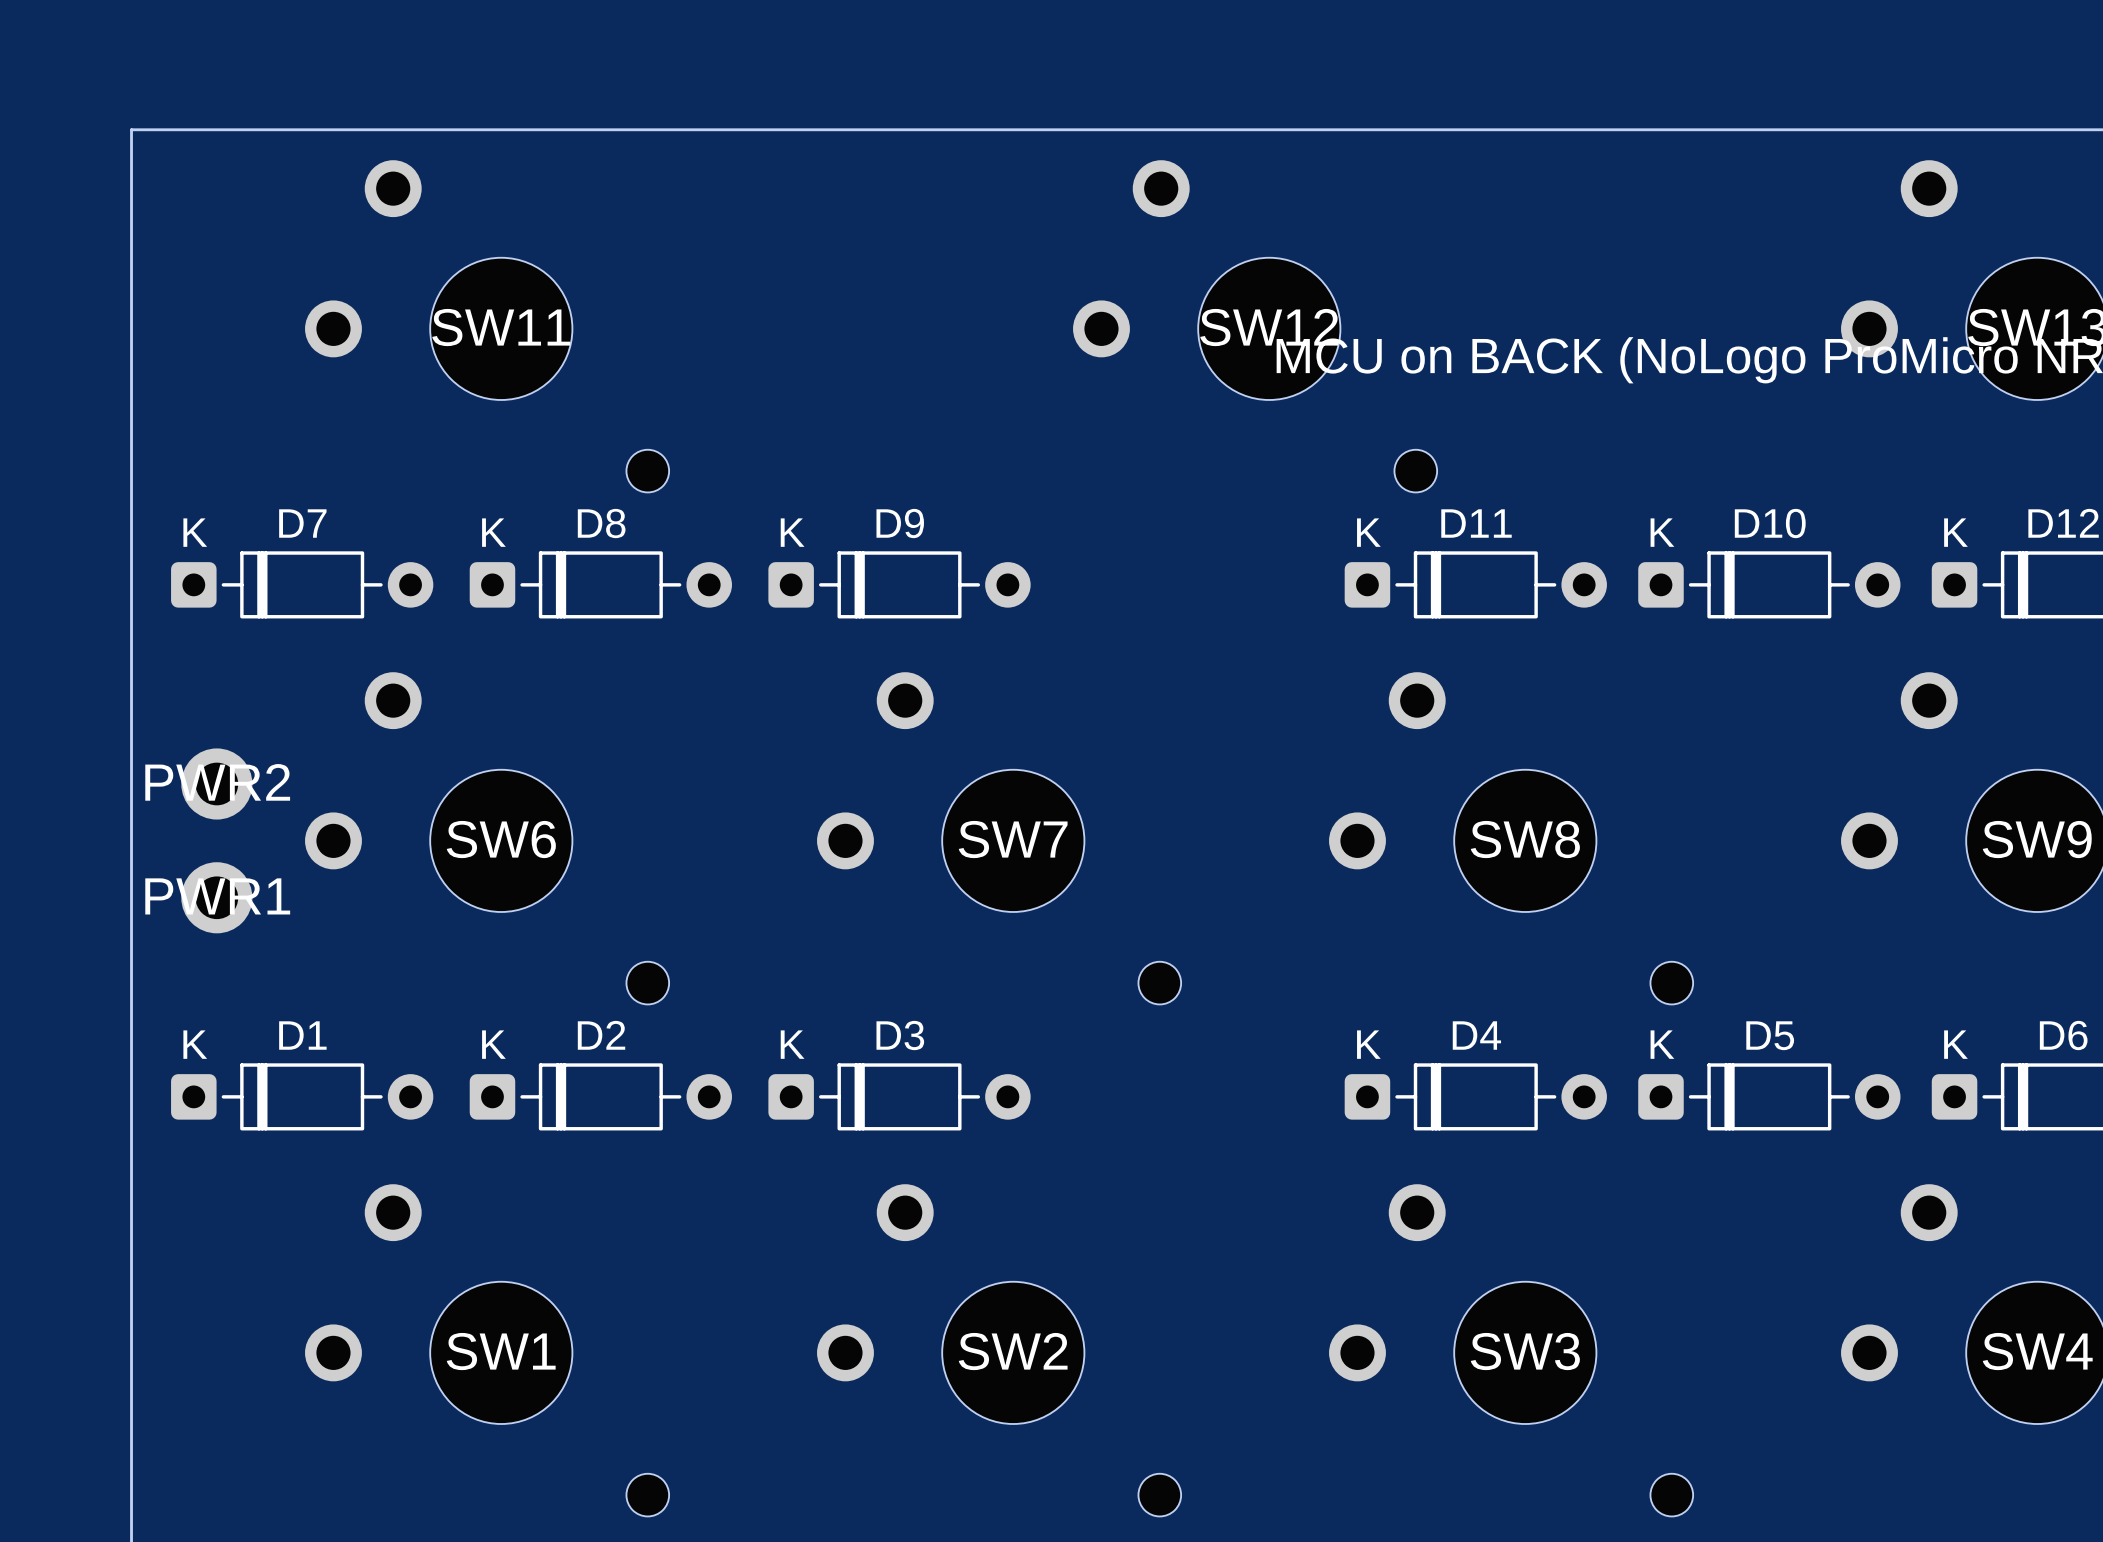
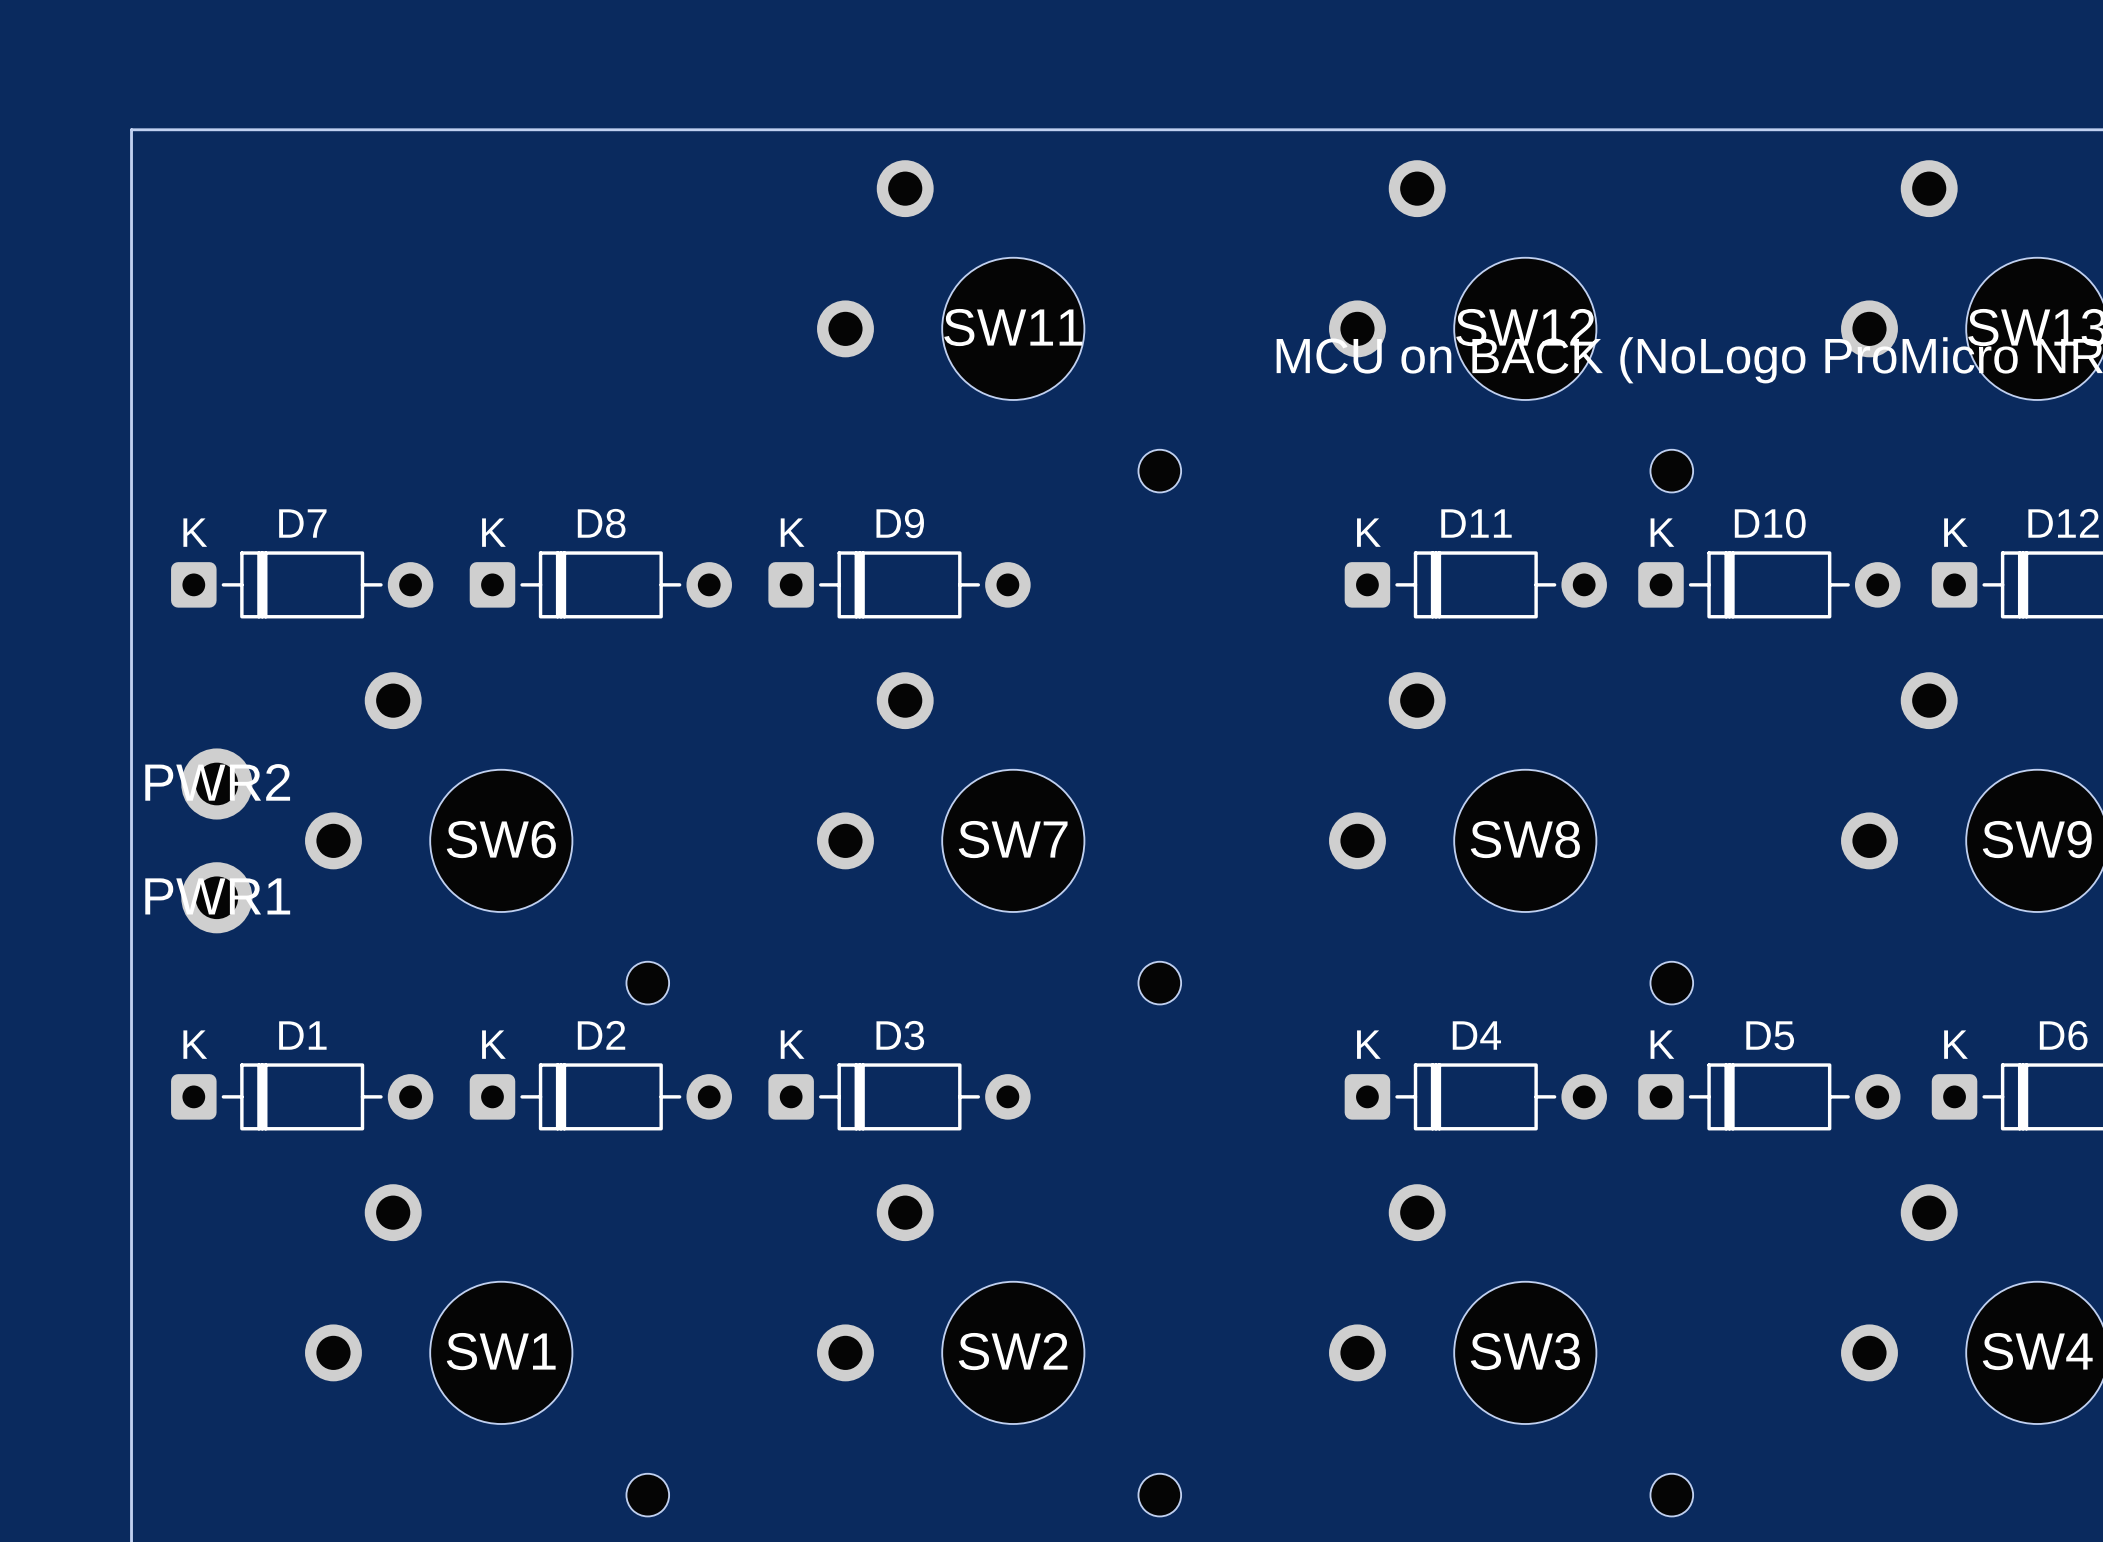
SW11 position: (487, 326) -> (999, 326)
SW12 position: (1255, 326) -> (1511, 326)

